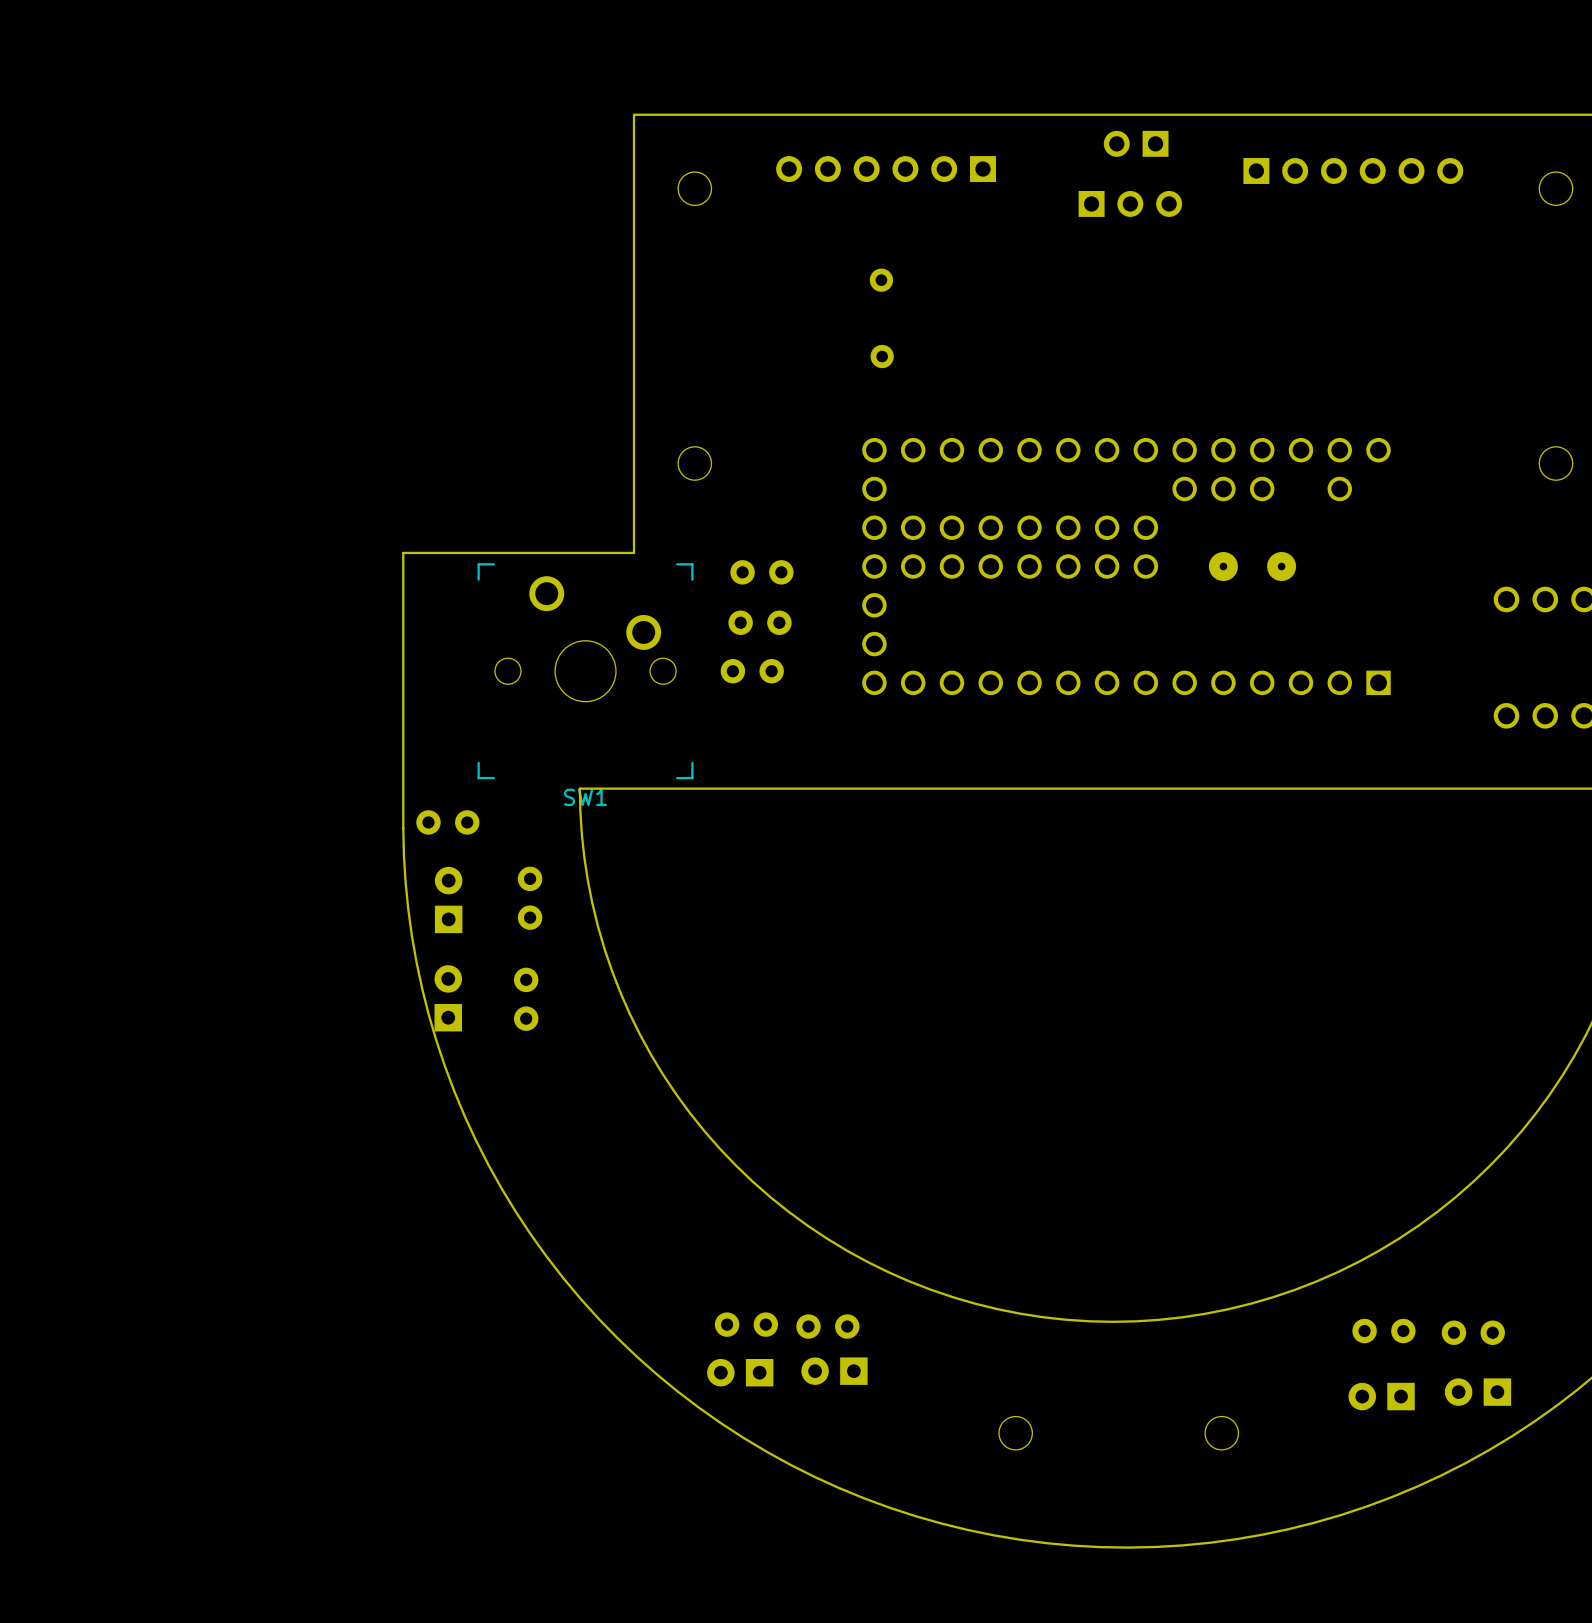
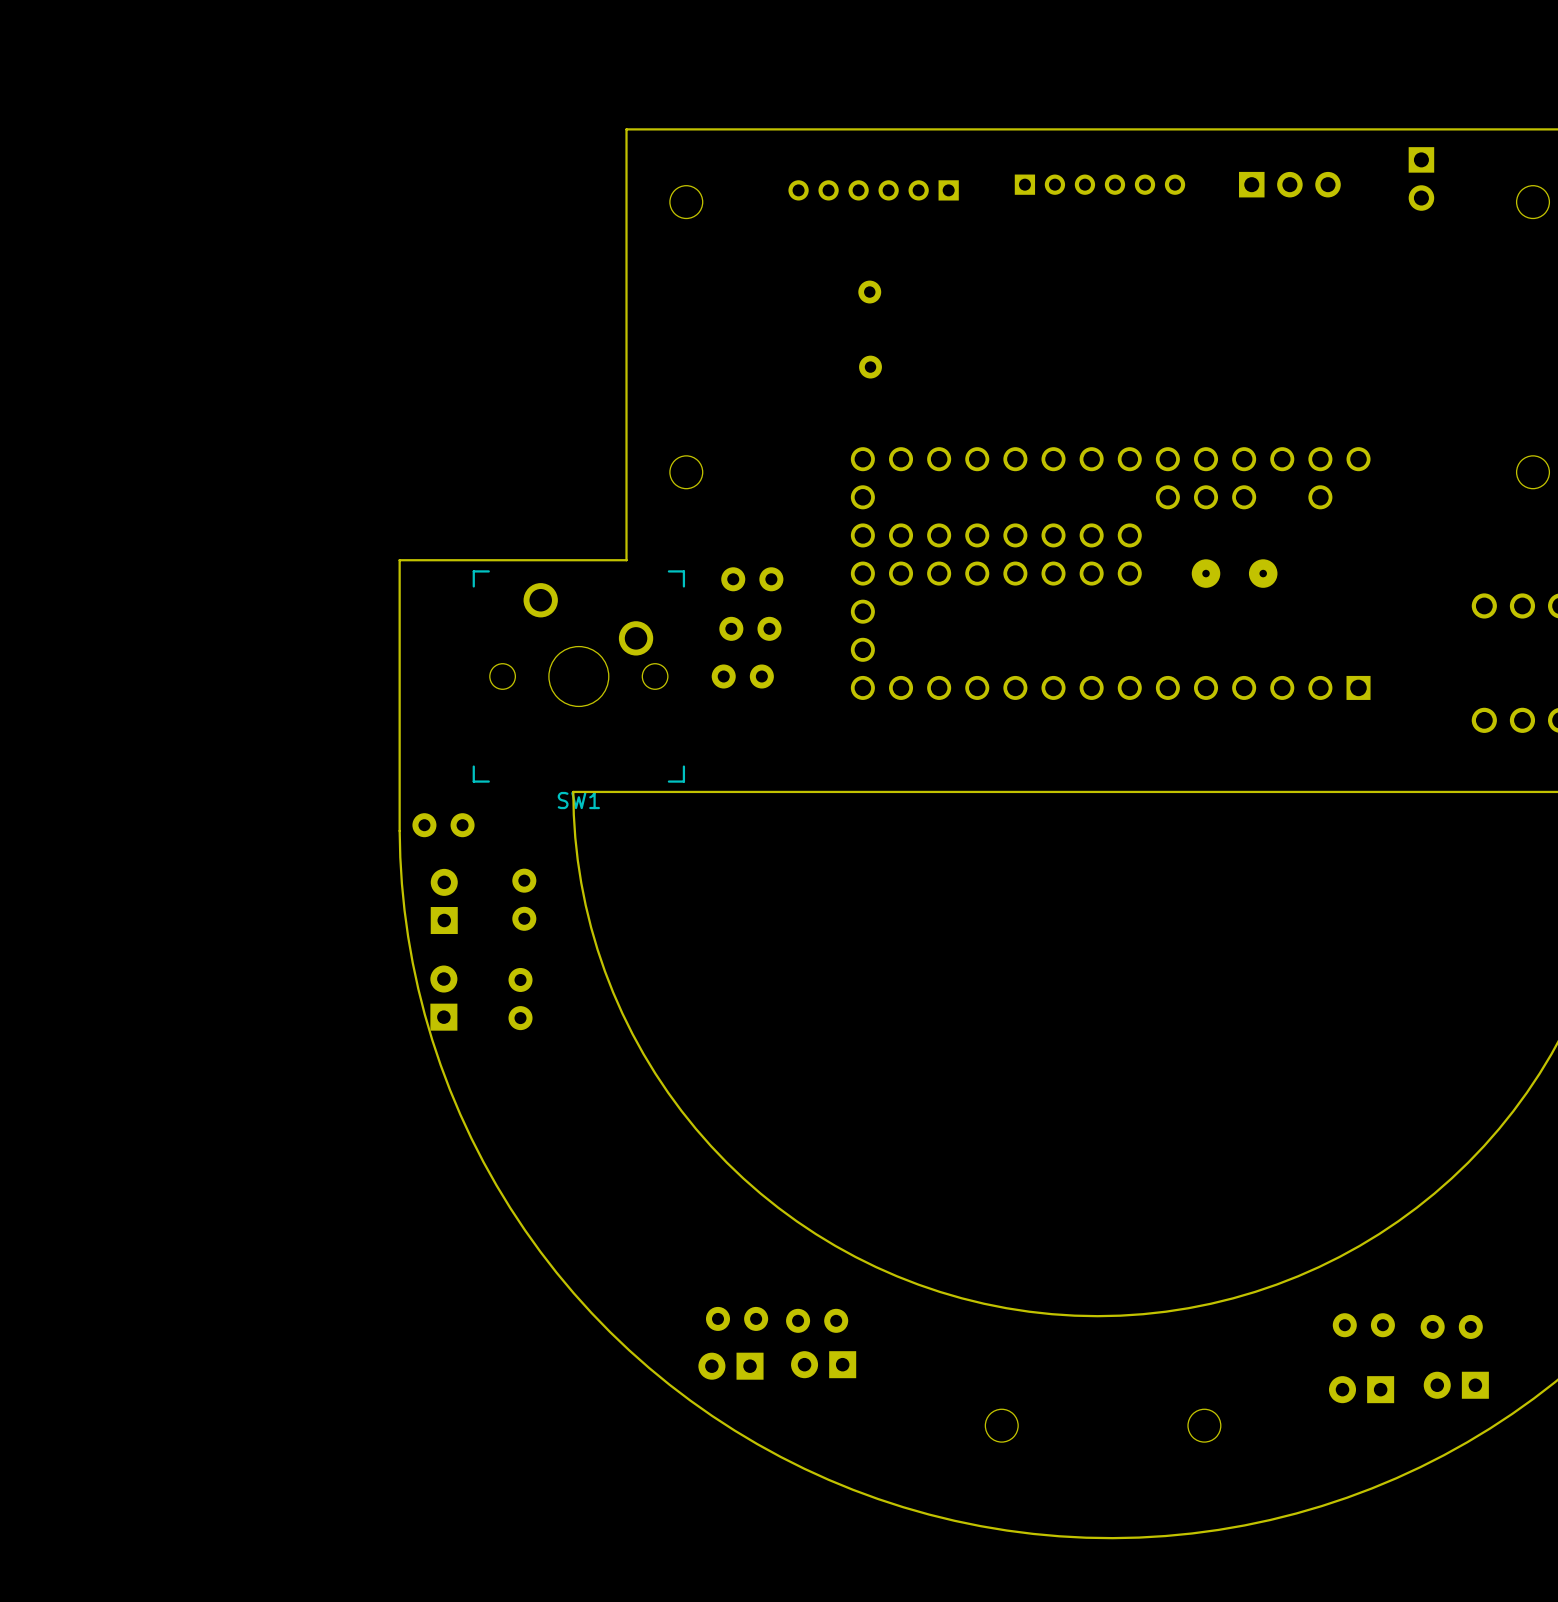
part rotation: 0° (1136, 143) -> 90° counterclockwise (1421, 178)
part position: (1136, 143) -> (1421, 178)
part footprint: [776, 156, 996, 183] -> [788, 180, 959, 201]
part: none -> (1099, 184)
part: (1353, 170) -> none
part position: (1130, 203) -> (1289, 184)

